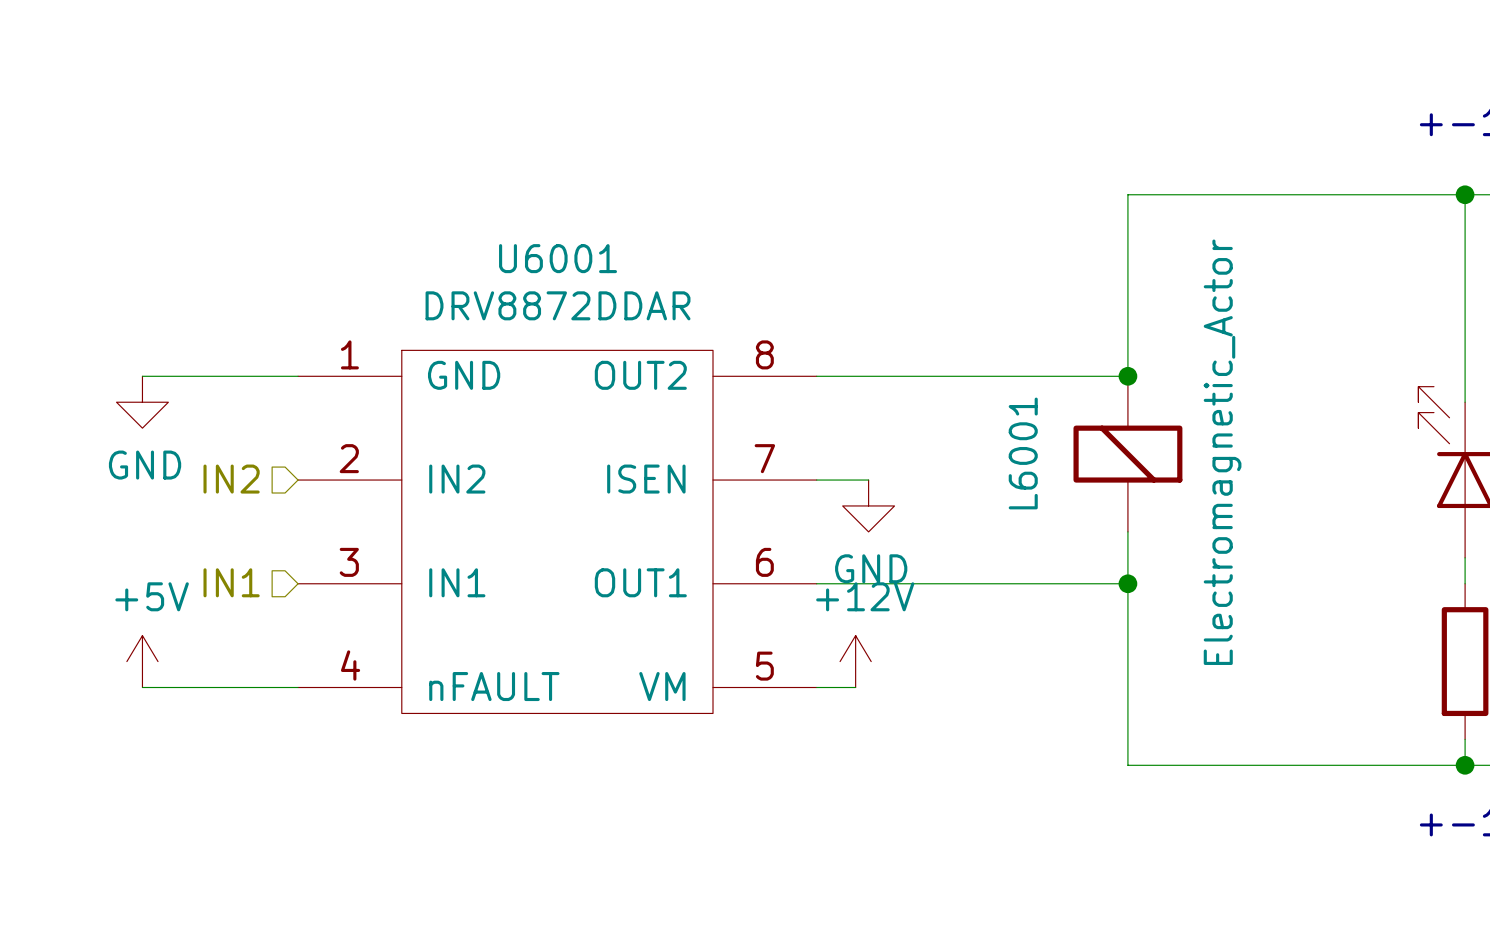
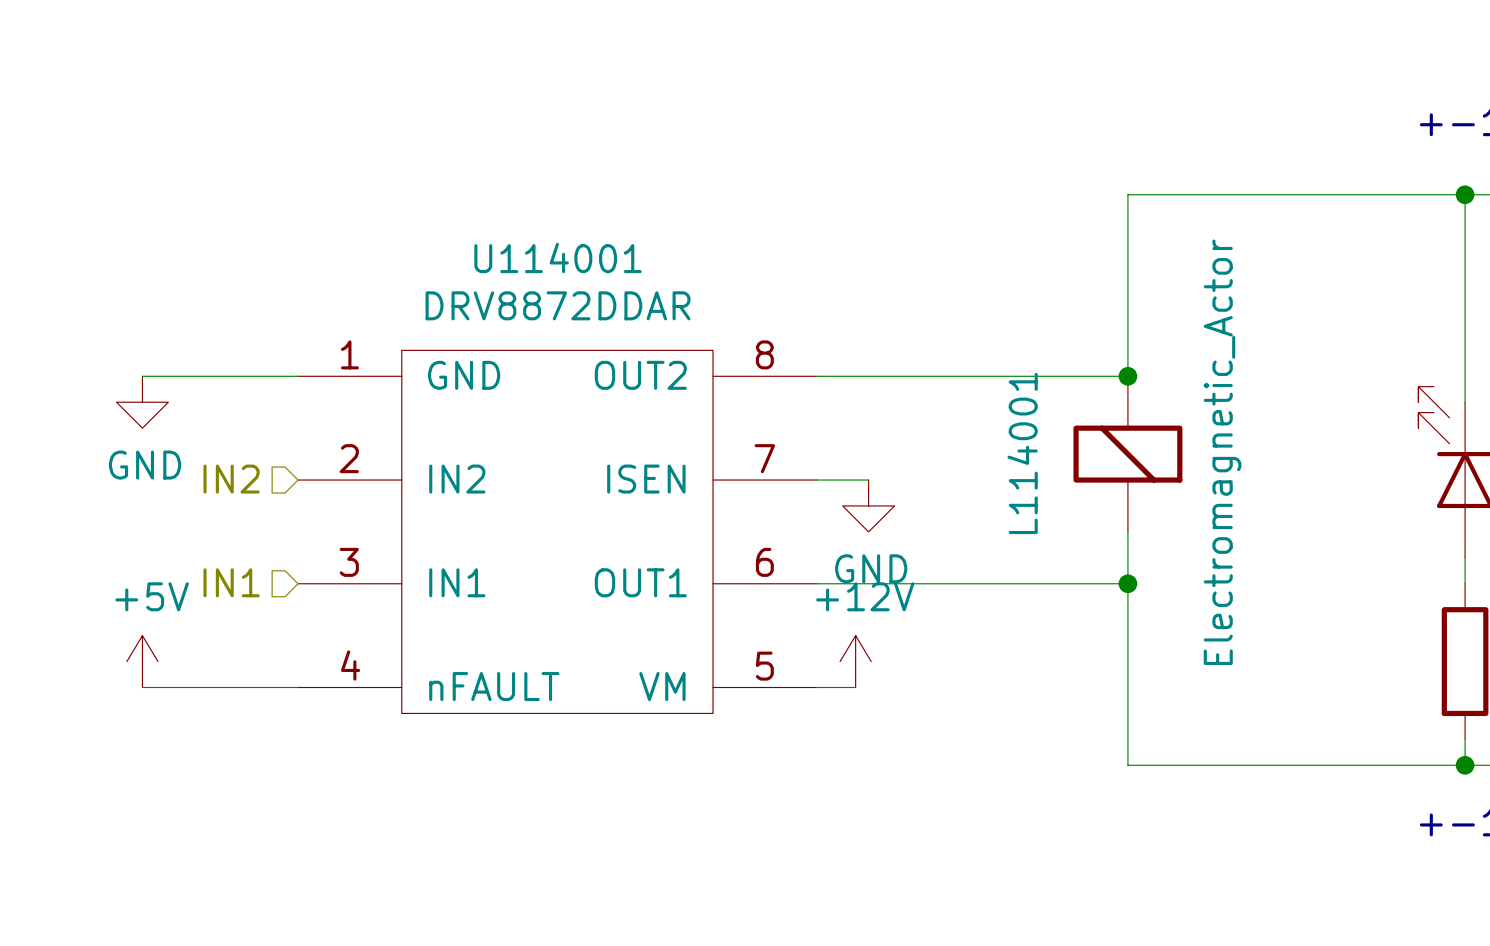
U6001 name: U6001 (558, 258) -> U114001 (558, 258)
L6001 name: L6001 (1023, 453) -> L114001 (1022, 453)

